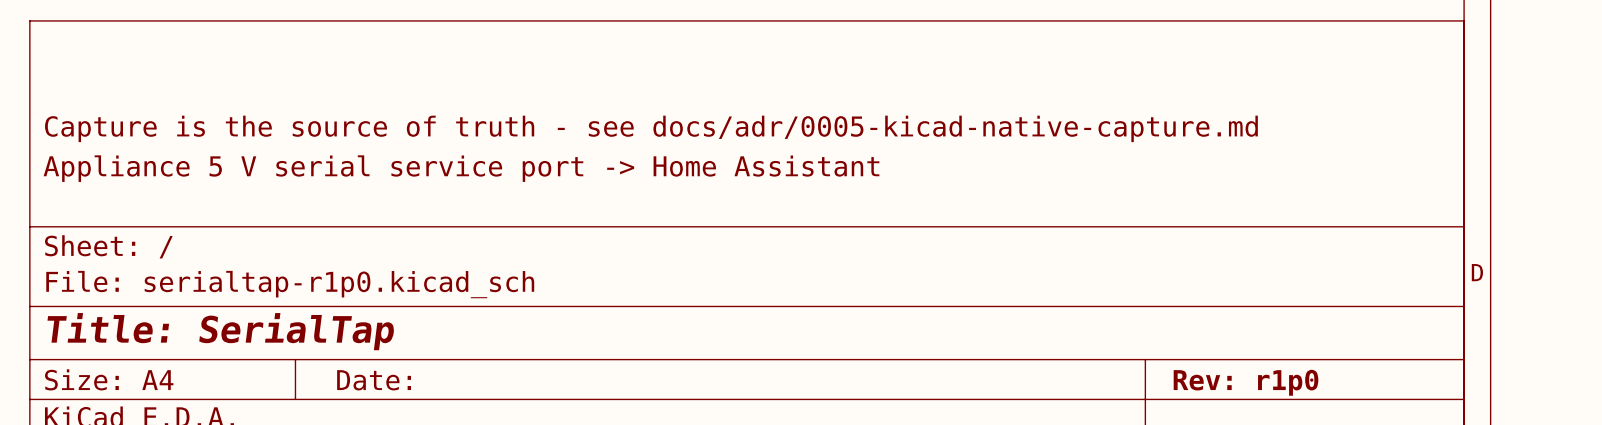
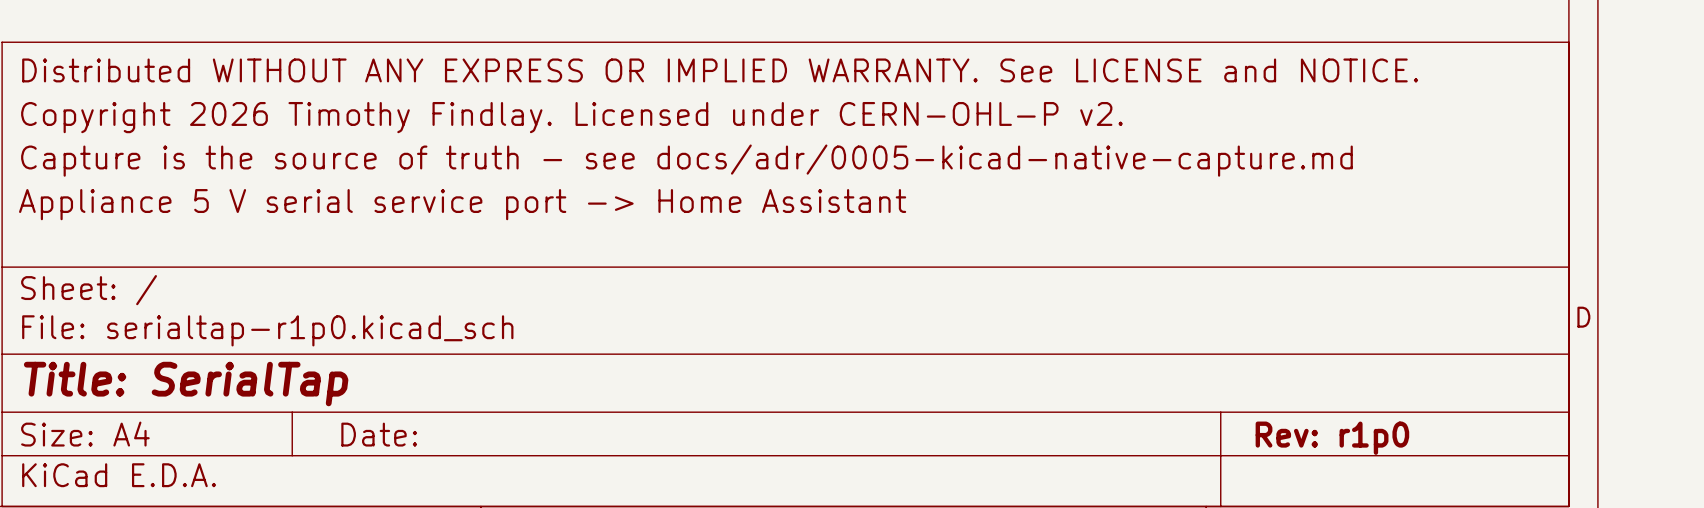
title block: none -> Distributed WITHOUT ANY EXPRESS OR IMPLIED WARRANTY. See LICENSE and NOTICE. (720, 70)
title block: none -> Copyright 2026 Timothy Findlay. Licensed under CERN-OHL-P v2. (571, 117)

